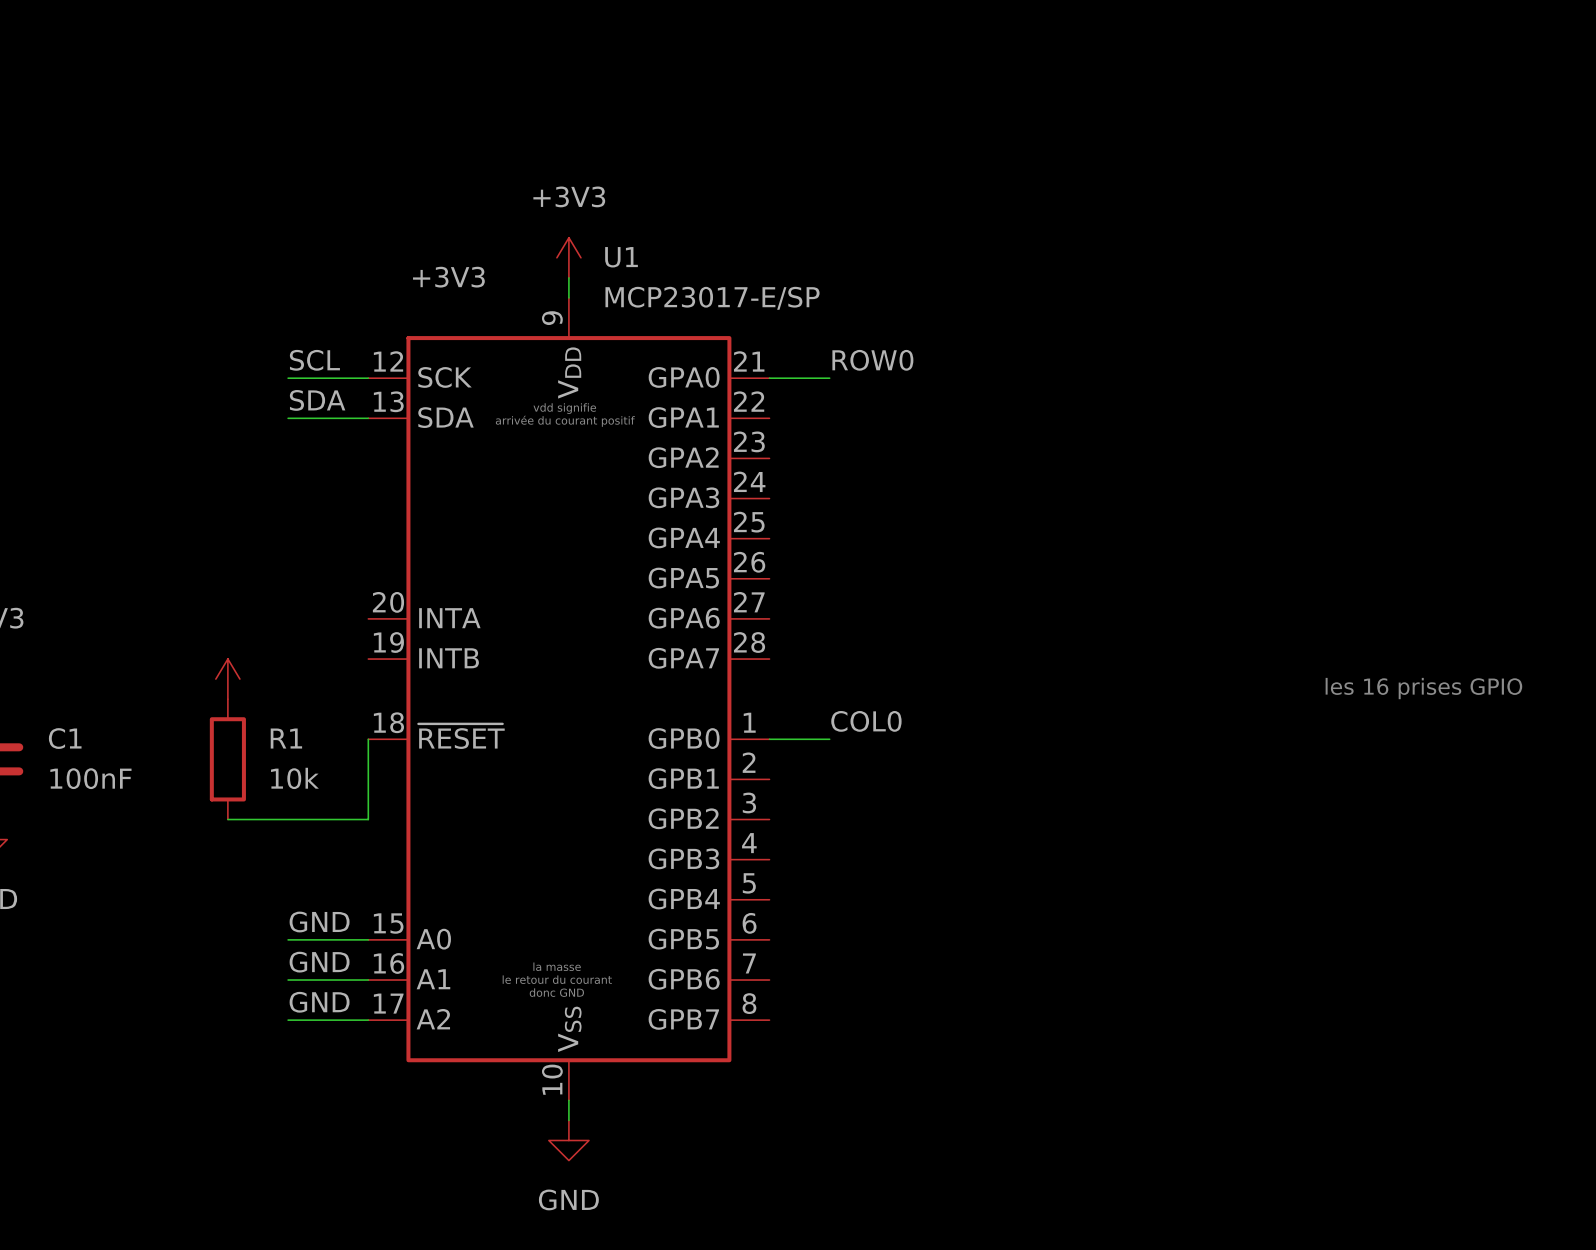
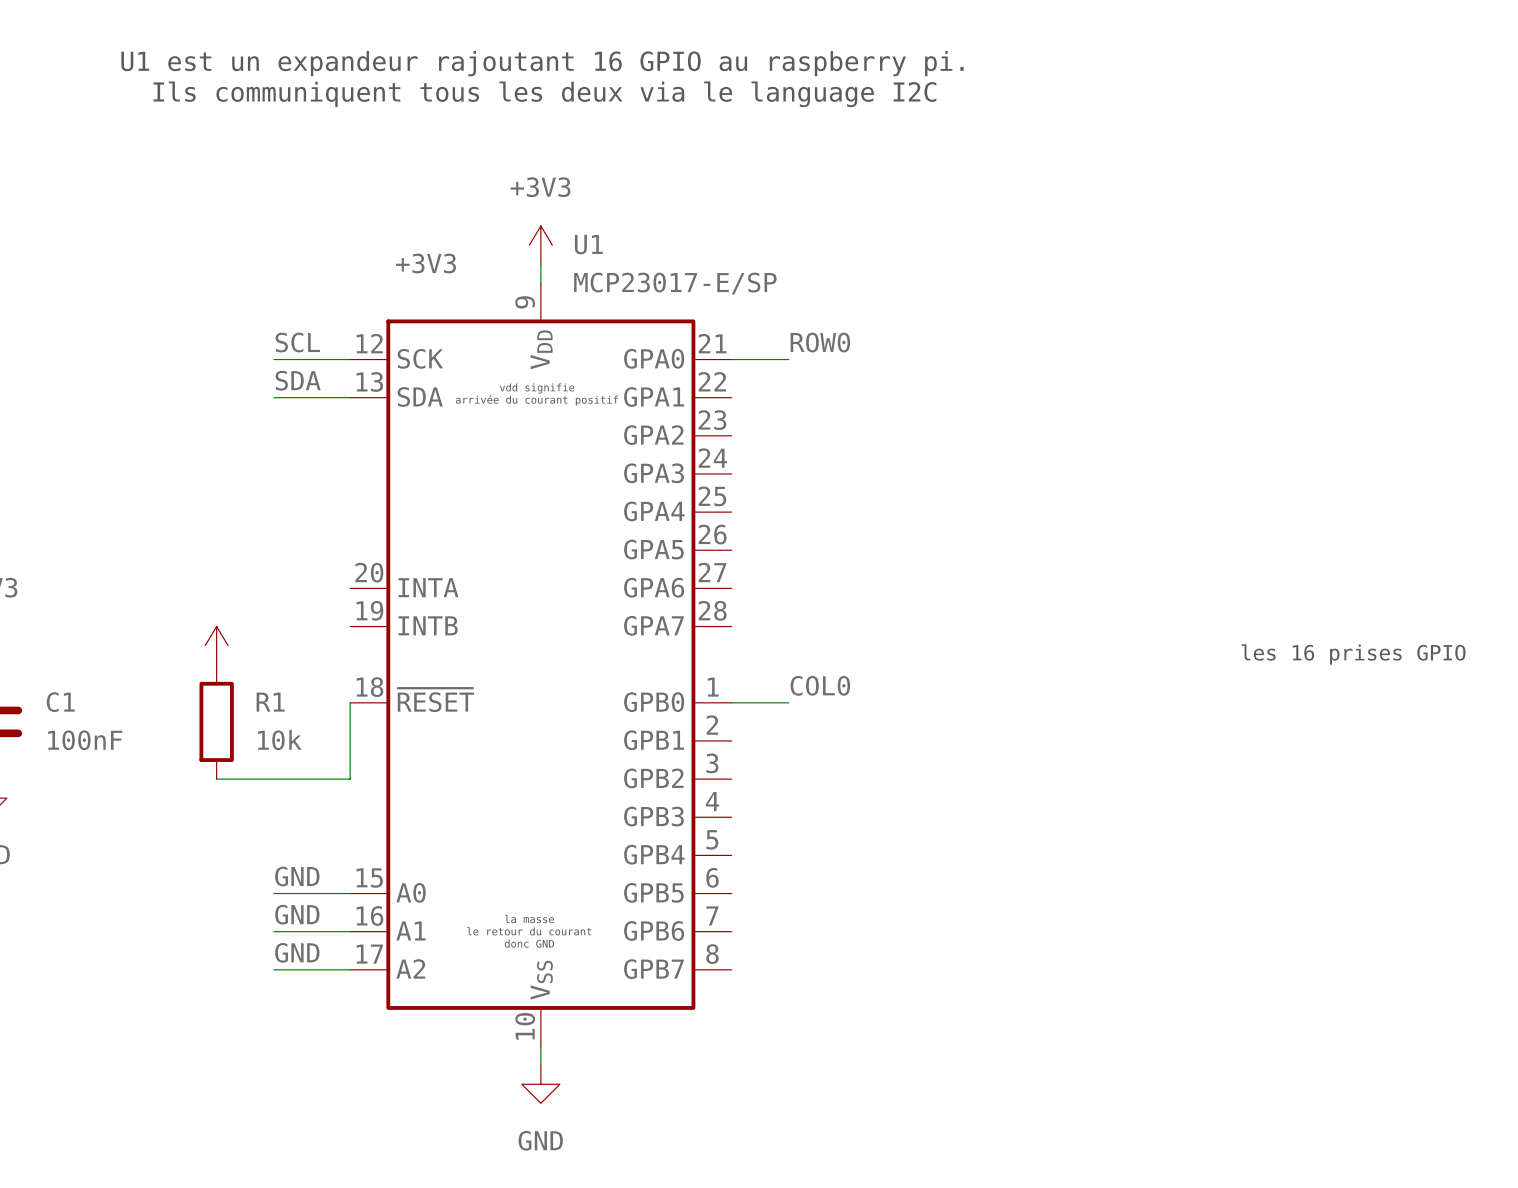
text: none -> U1 est un expandeur rajoutant 16 GPIO au raspberry pi. (542, 63)
text: none -> Ils communiquent tous les deux via le language I2C (544, 94)

